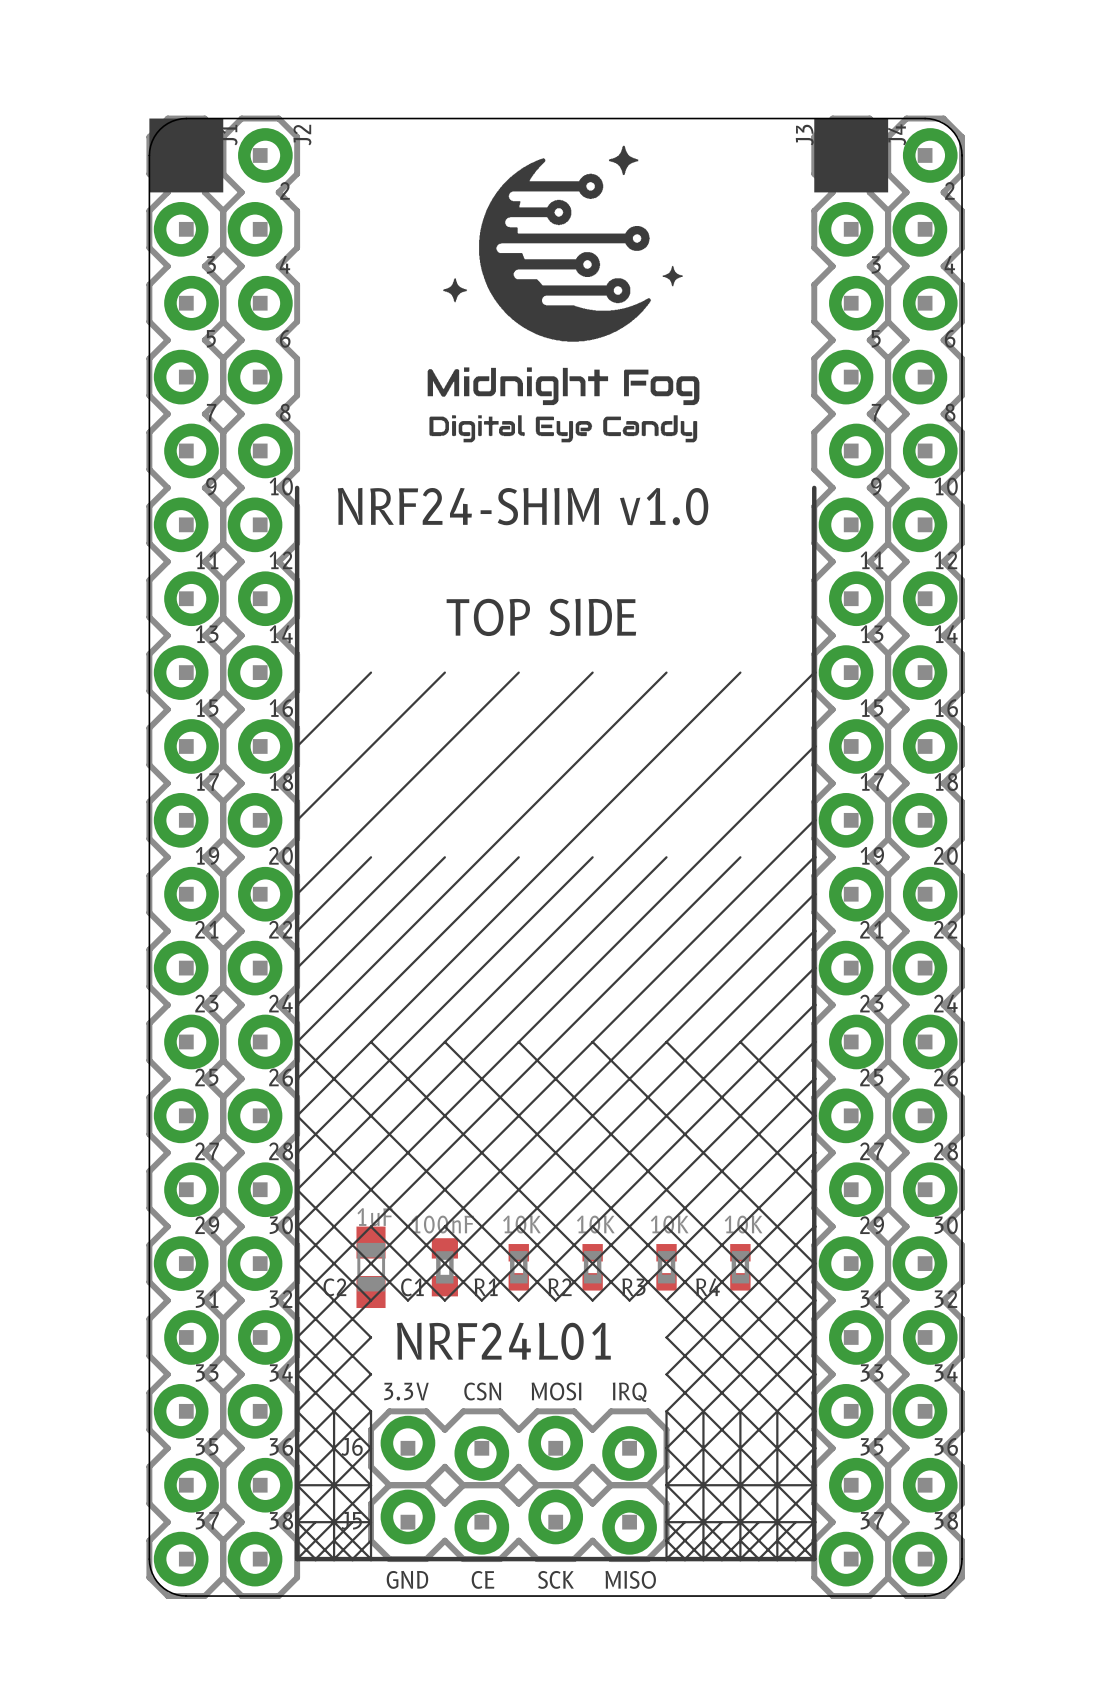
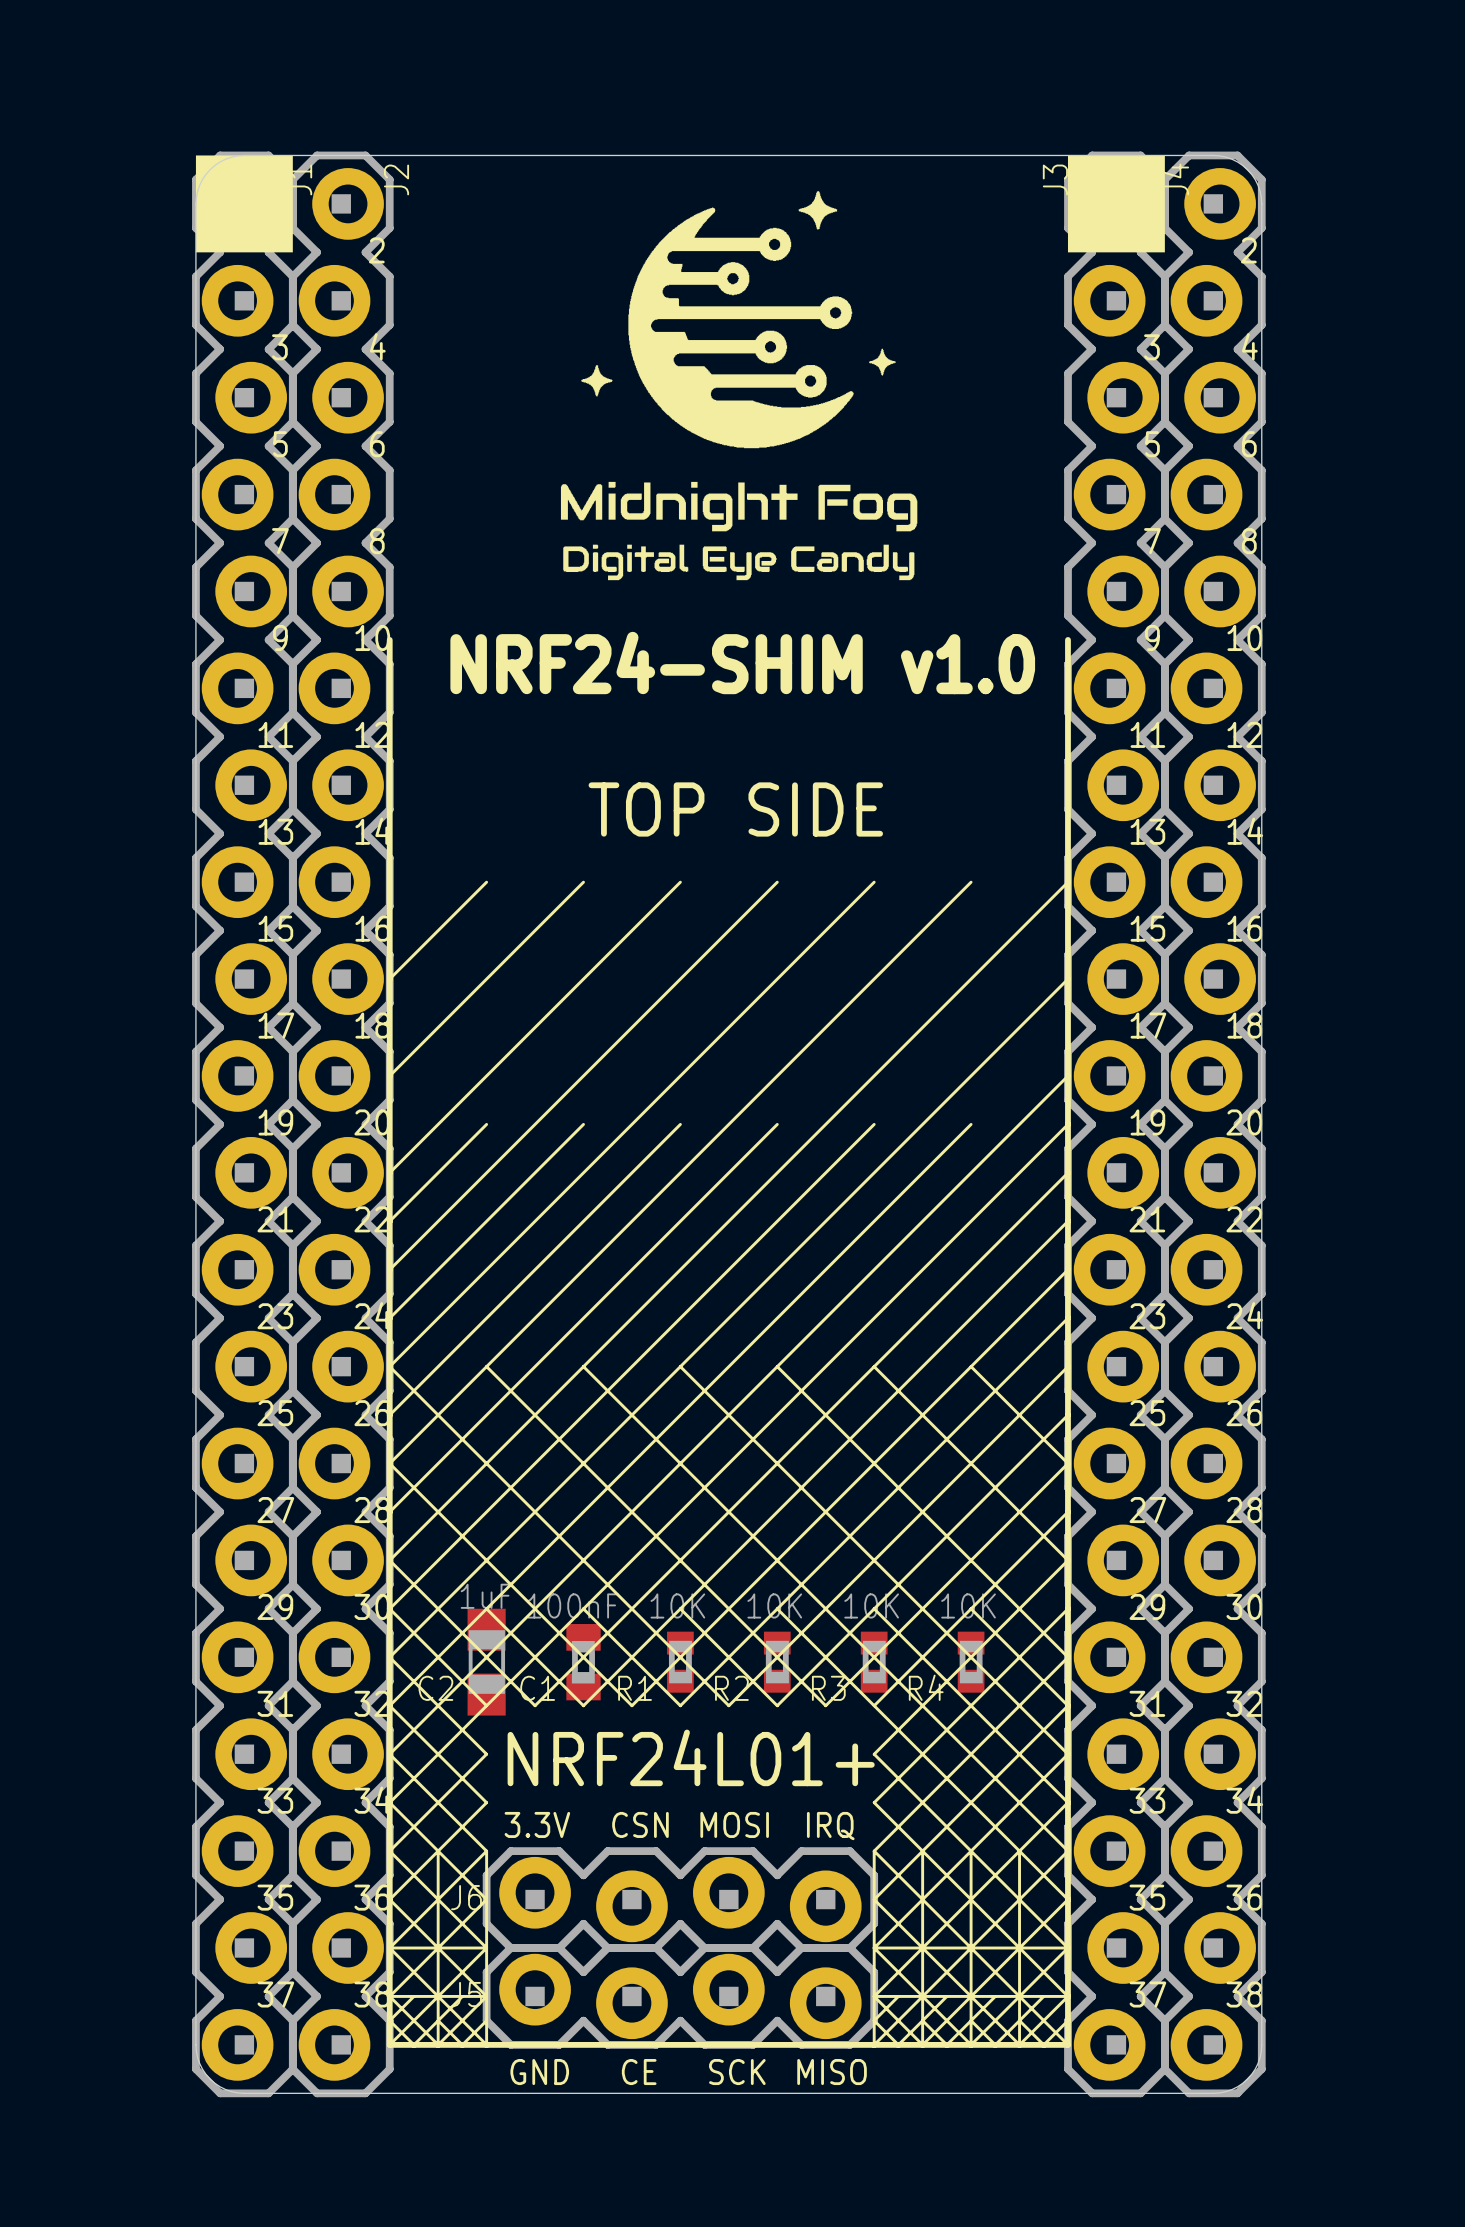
text: NRF24L01 (503, 1341) -> NRF24L01+ (691, 1757)

